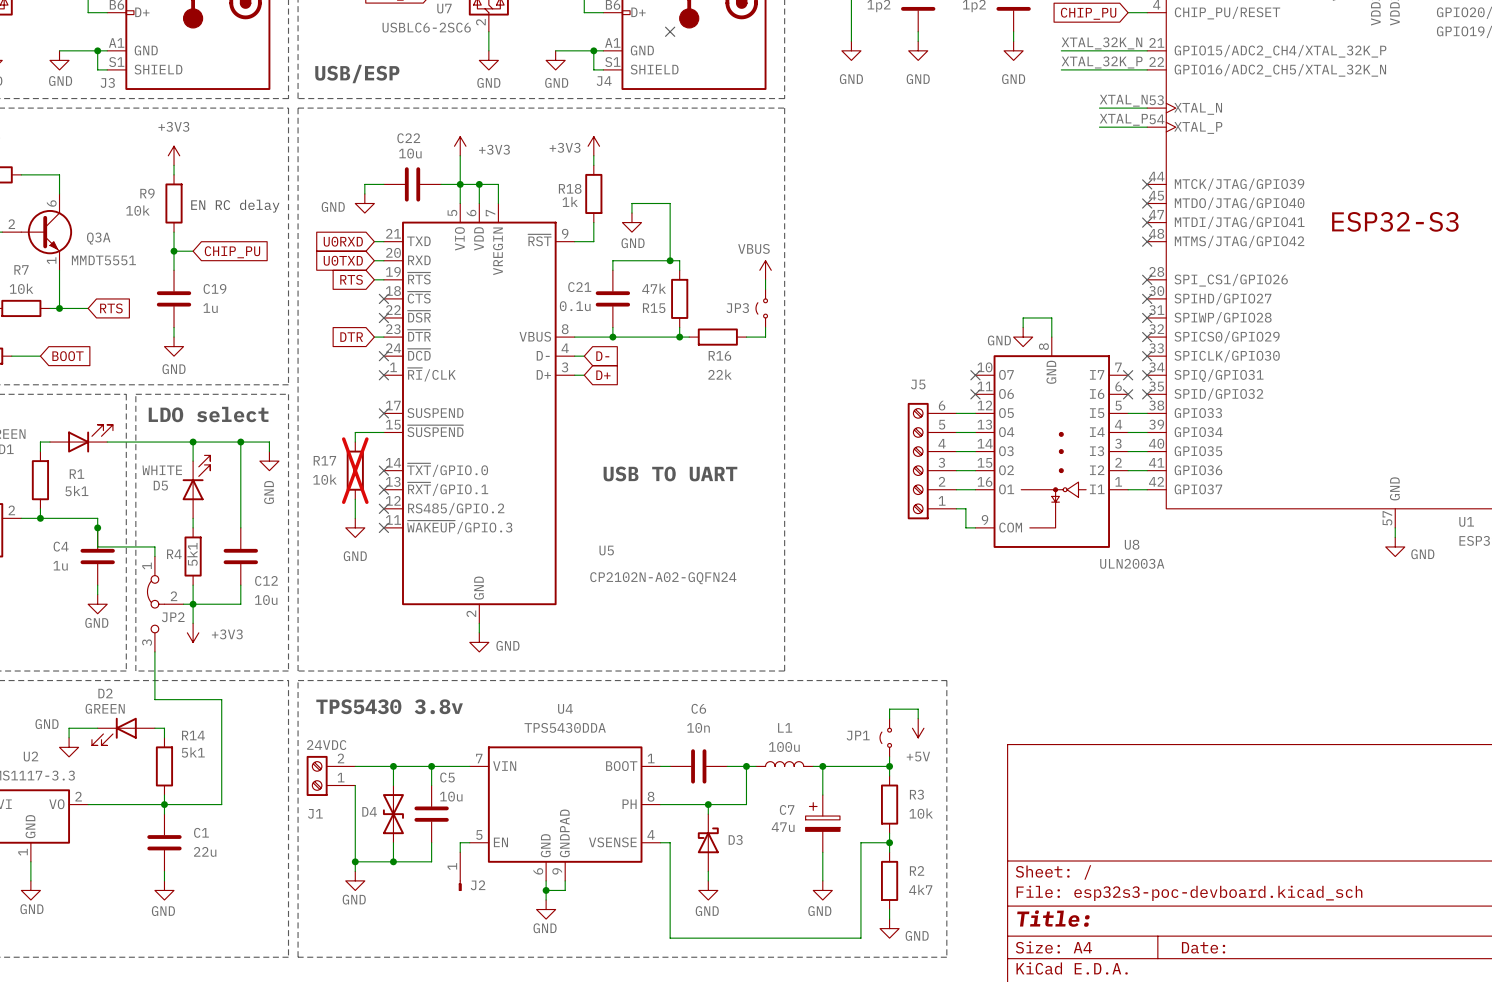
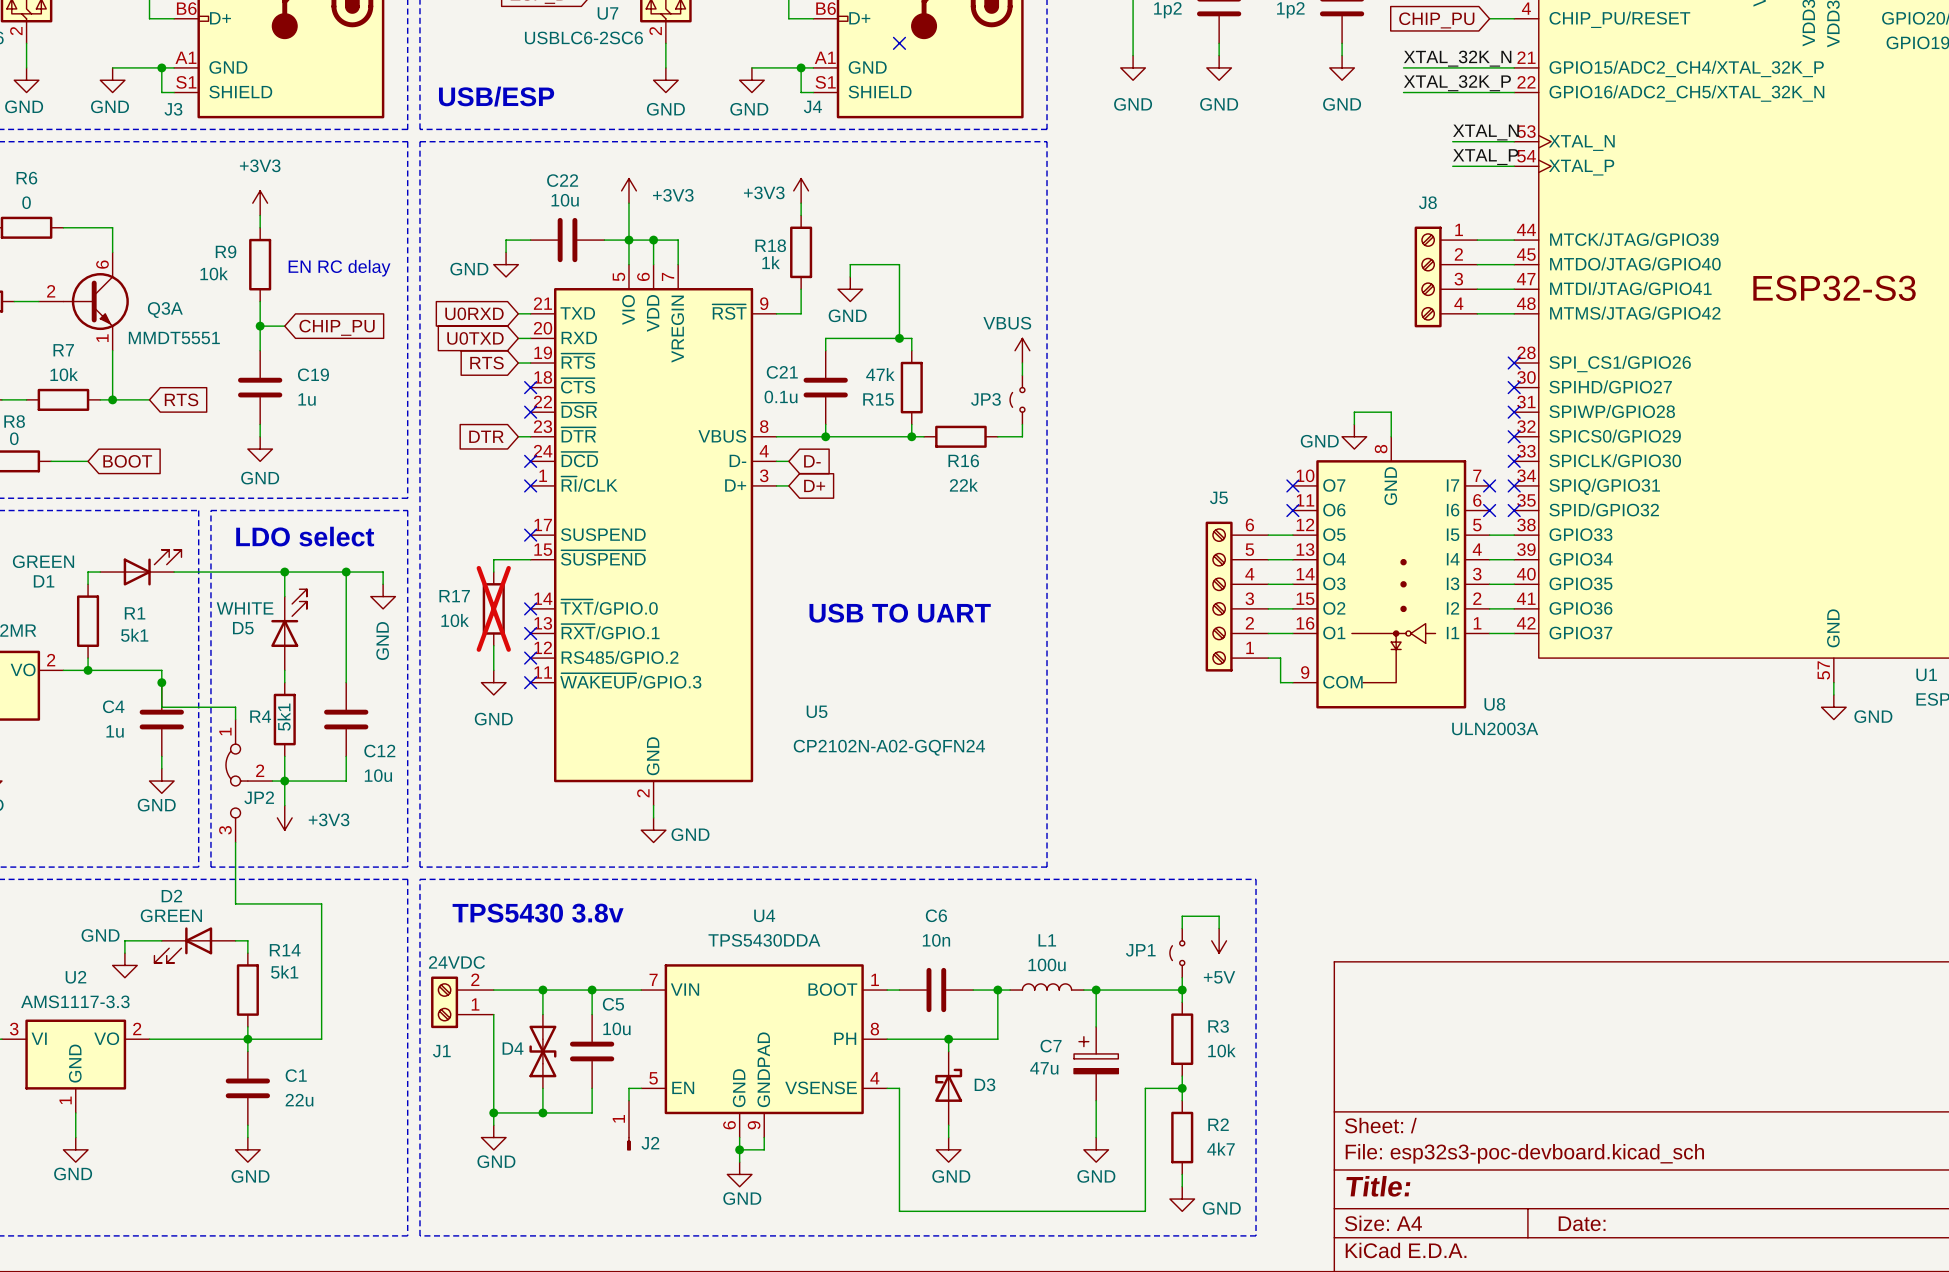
wire: none -> (1477, 240) (1514, 240)
no-connect mark: (1147, 184) -> none
wire: none -> (1477, 264) (1514, 264)
no-connect mark: (1147, 203) -> none
J8: none -> (1445, 276)
wire: none -> (1477, 289) (1514, 289)
no-connect mark: (1147, 222) -> none
wire: none -> (1477, 313) (1514, 313)
no-connect mark: (1147, 241) -> none

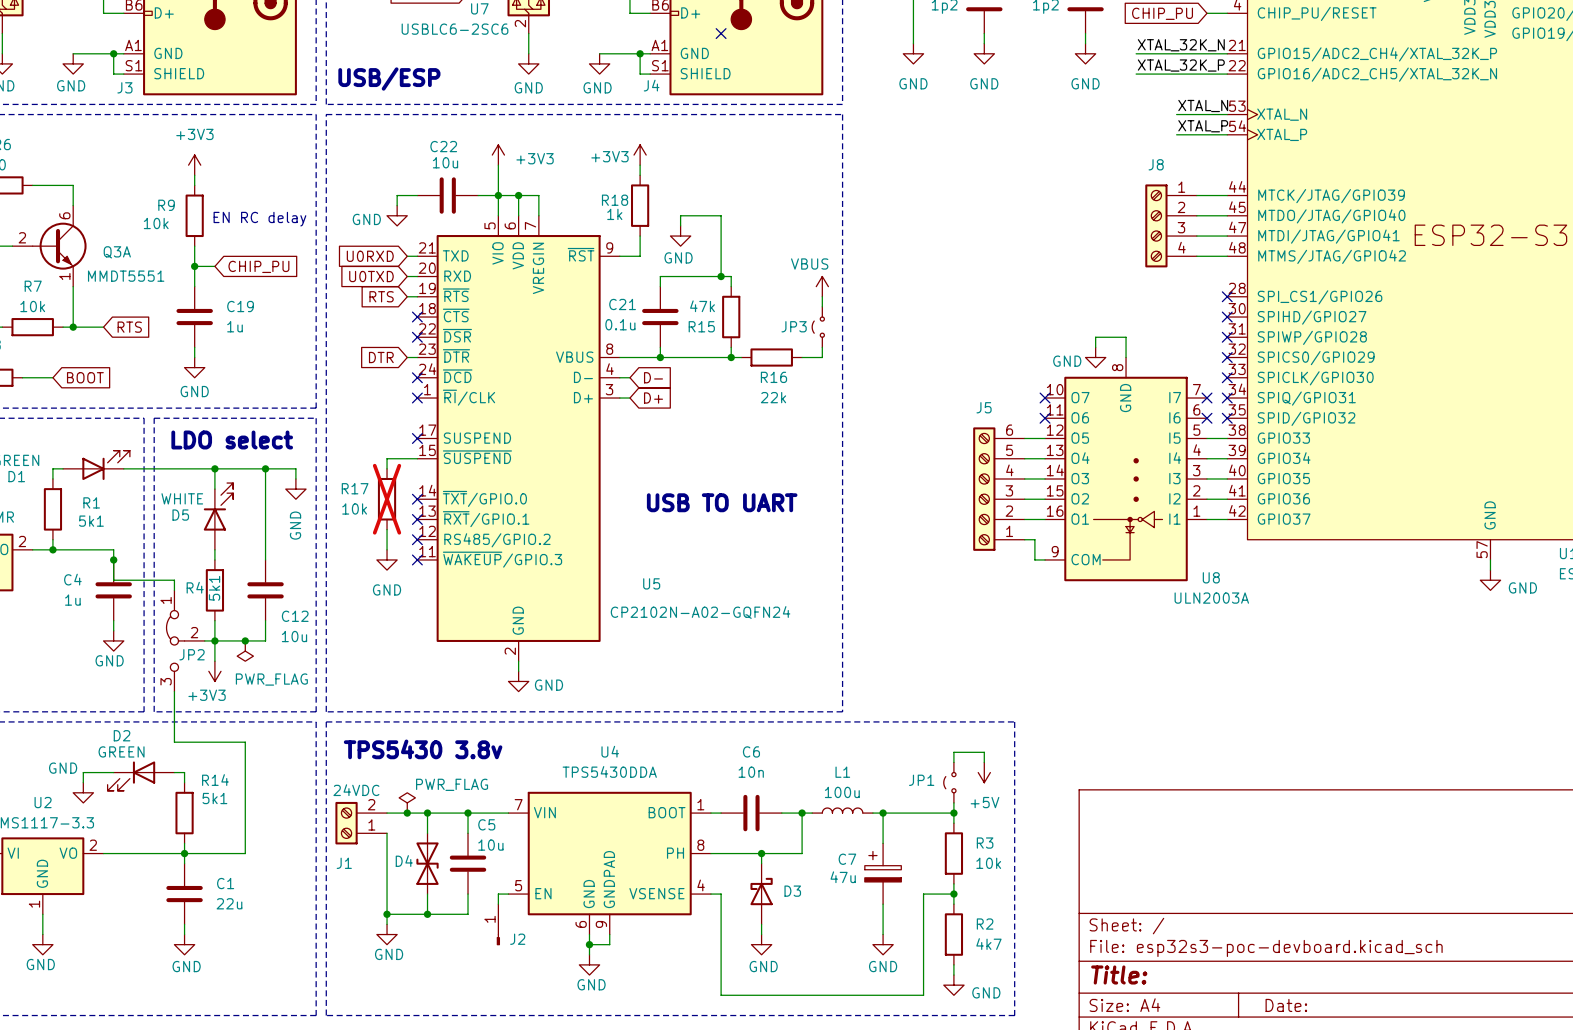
junction: none -> (245, 640)
power symbol: none -> PWR_FLAG (245, 651)
power symbol text position: +3V3 (329, 819) -> +3V3 (207, 695)
power symbol: none -> PWR_FLAG (407, 802)
junction: none -> (407, 813)

